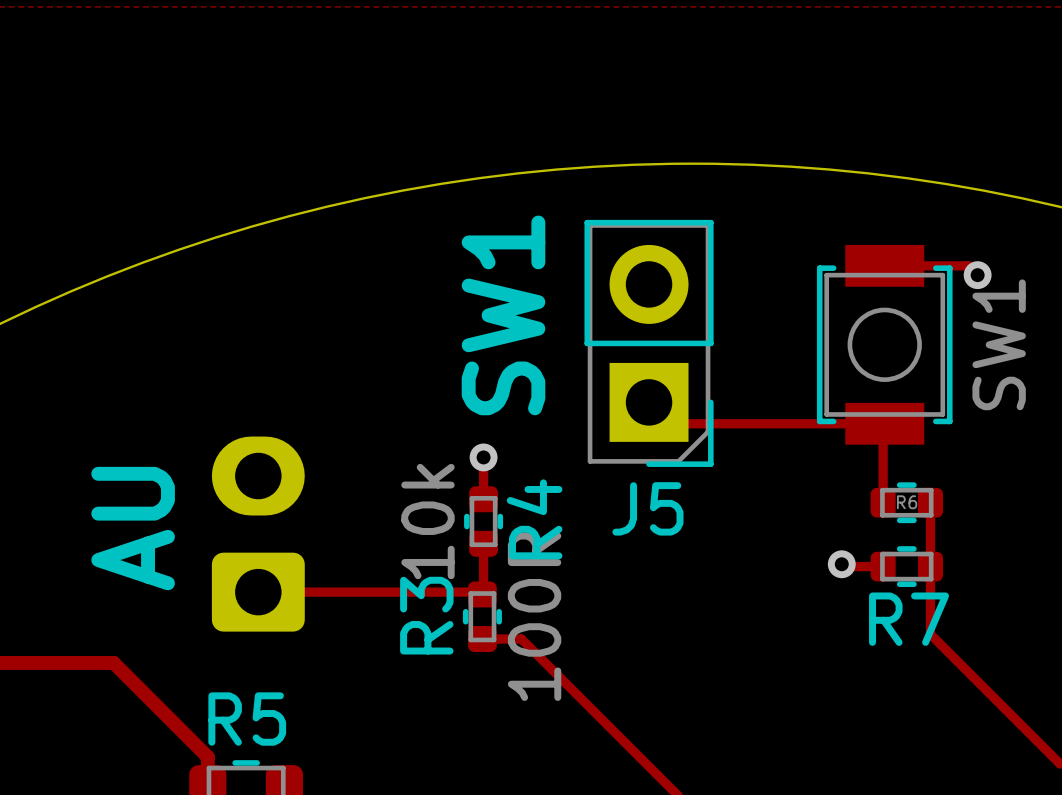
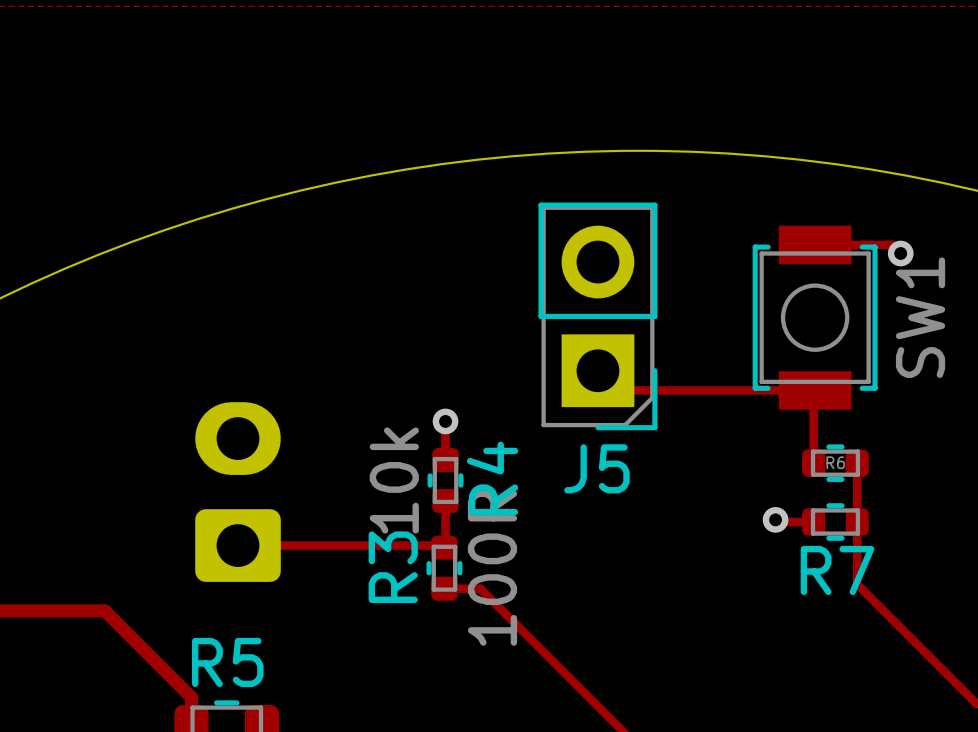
text: SW1 (503, 315) -> none
text: AU (133, 528) -> none

